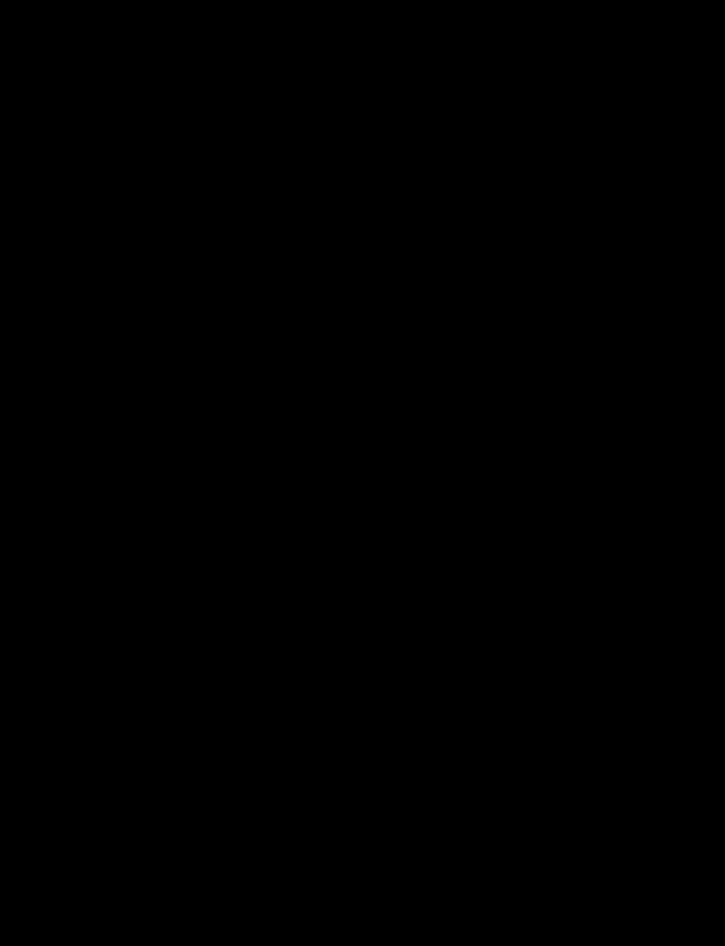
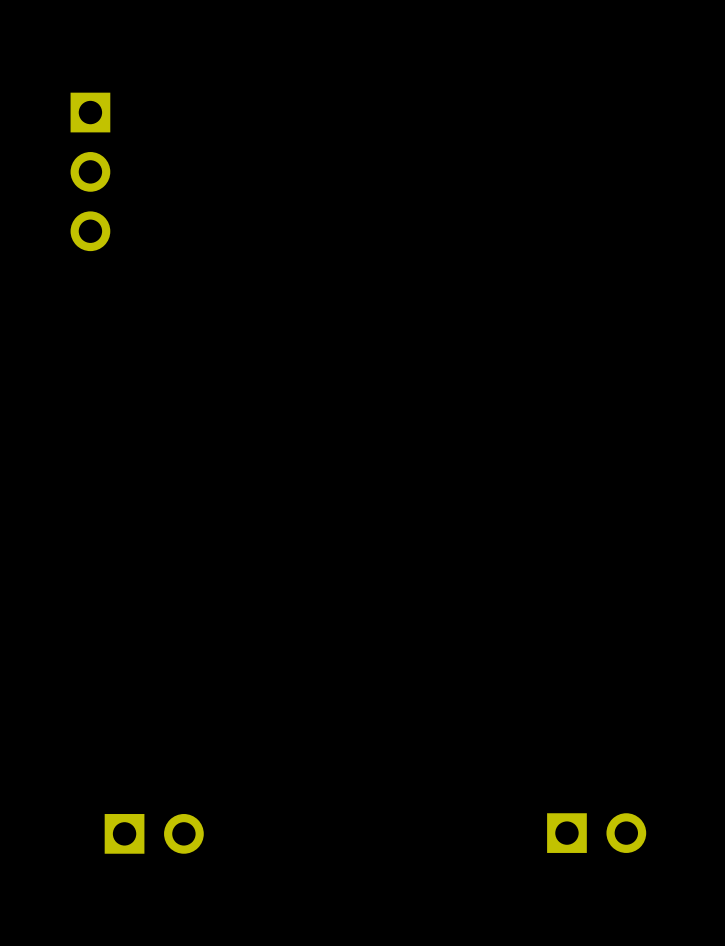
part: none -> (90, 171)
part: none -> (154, 833)
part: none -> (596, 833)

